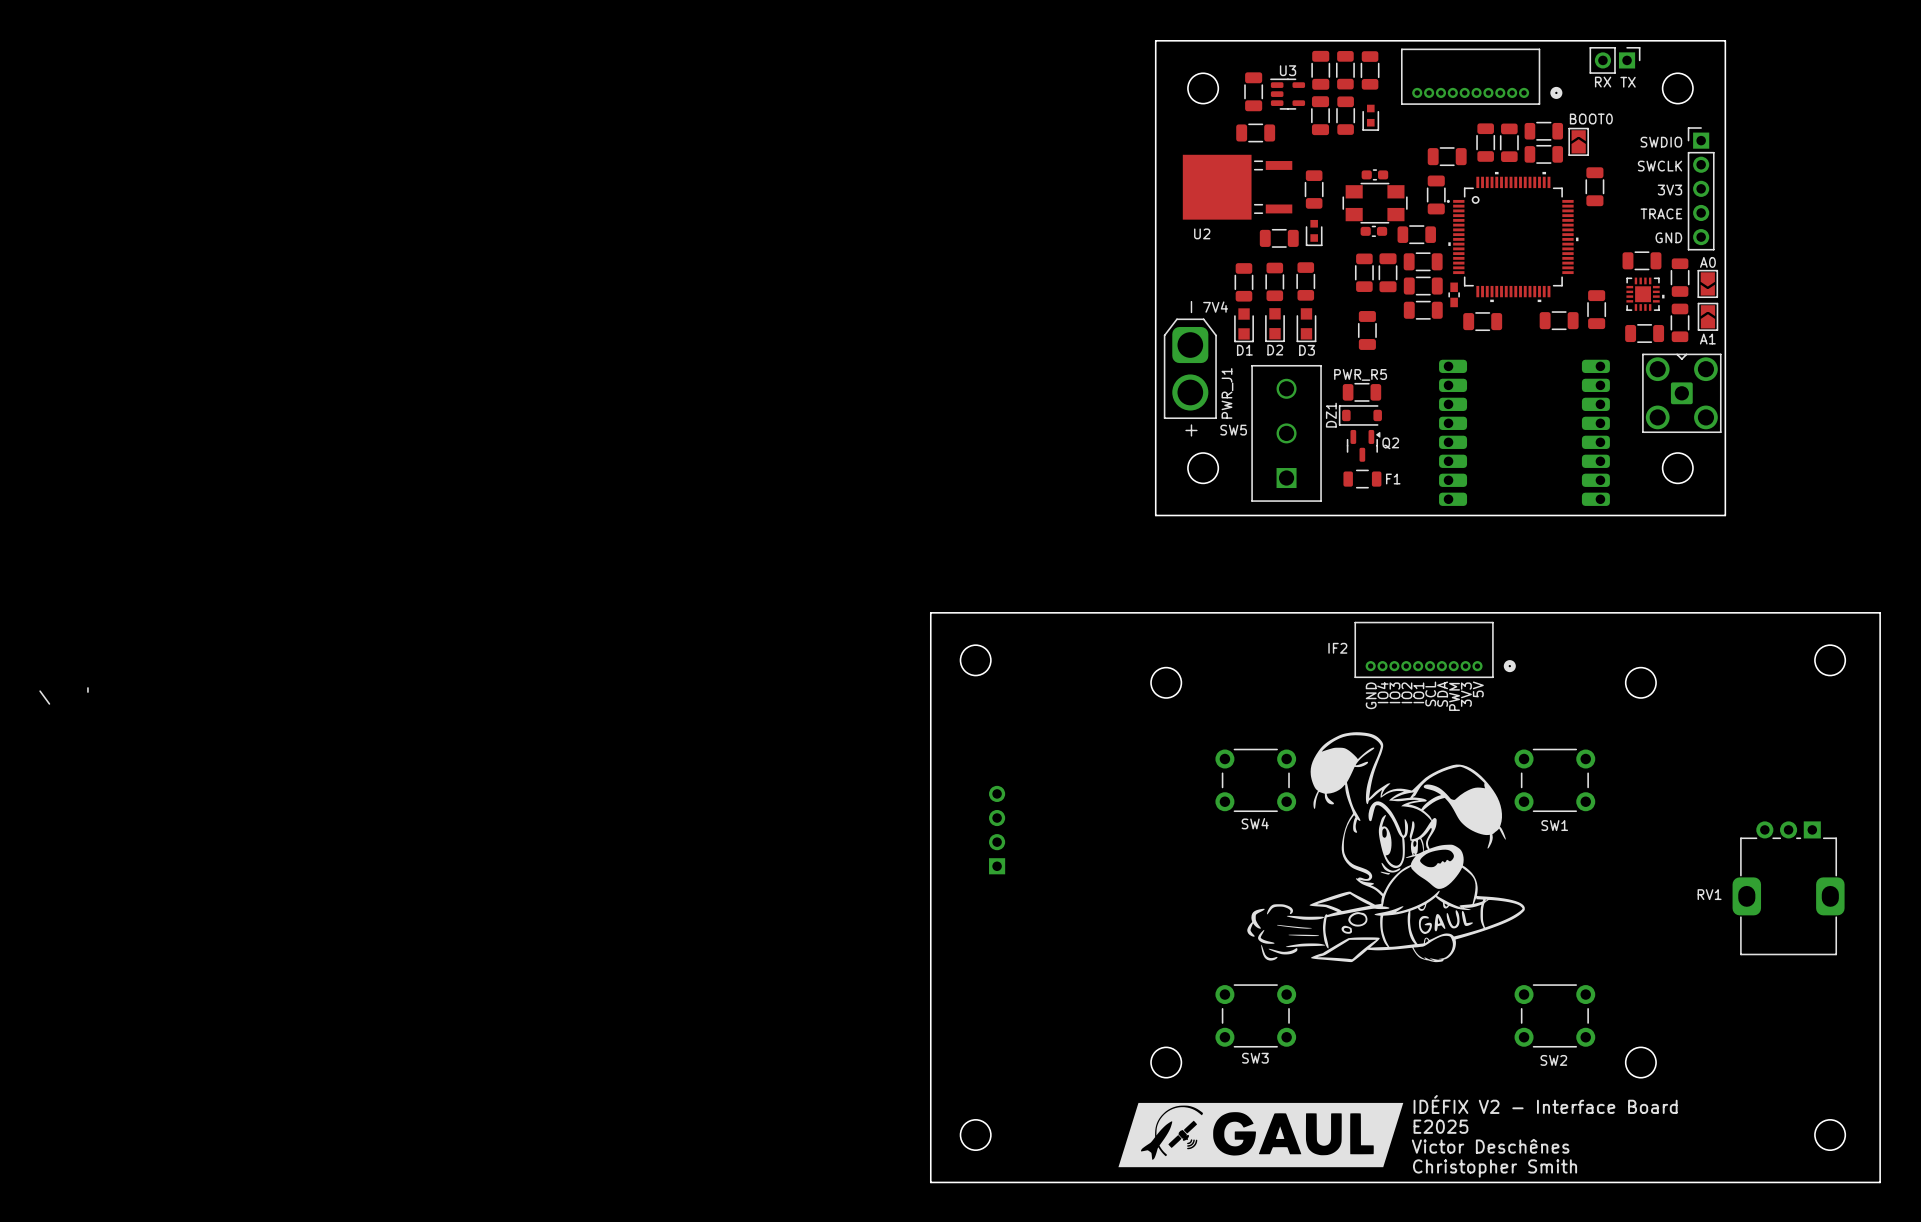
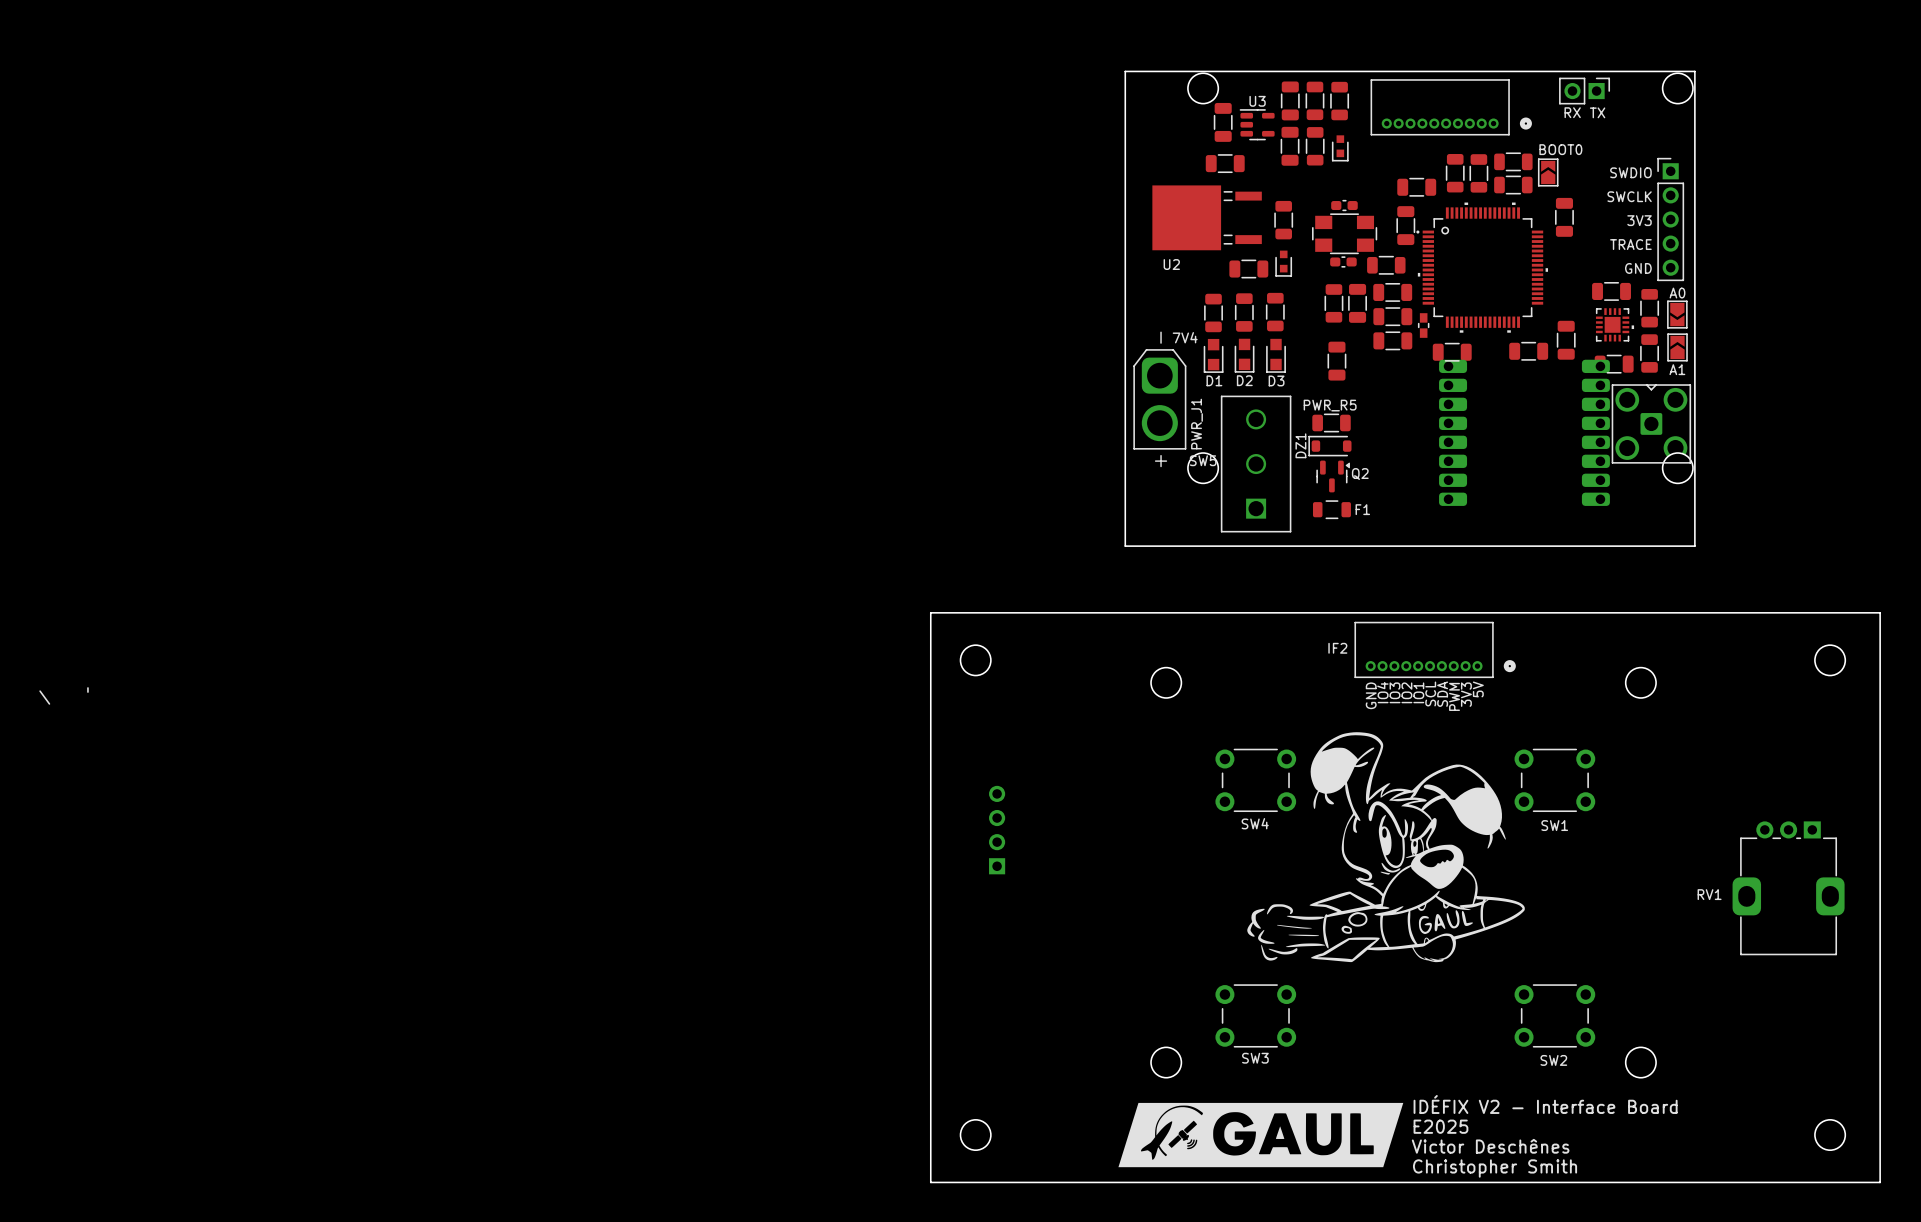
board edge: (1155, 40) (1725, 40) (1725, 515) (1155, 515) (1155, 40) -> (1125, 71) (1694, 71) (1694, 546) (1125, 546) (1125, 71)
part position: (1614, 60) -> (1584, 91)
part: (1320, 70) -> none
part: (1345, 70) -> none
part: (1370, 70) -> none
part position: (1481, 76) -> (1451, 107)
text position: RX (1603, 82) -> RX (1572, 112)
text position: TX (1628, 82) -> TX (1597, 112)
part: (1253, 91) -> none
U3 position: (1287, 94) -> (1257, 124)
part: none -> (1290, 100)
part: none -> (1314, 100)
part: none -> (1339, 101)
part: (1320, 115) -> none
part: (1345, 115) -> none
part position: (1370, 117) -> (1340, 148)
text position: BOOT0 (1591, 119) -> BOOT0 (1560, 149)
part: none -> (1223, 122)
part: (1543, 131) -> none
part: (1255, 132) -> none
part position: (1578, 141) -> (1548, 172)
part: (1485, 142) -> none
part: (1509, 142) -> none
text position: SWDIO (1661, 142) -> SWDIO (1630, 172)
part: none -> (1290, 146)
part: none -> (1315, 146)
part: (1543, 154) -> none
part: (1447, 156) -> none
part: none -> (1513, 161)
part: none -> (1225, 163)
text position: SWCLK (1660, 166) -> SWCLK (1629, 196)
part: none -> (1455, 173)
part: none -> (1478, 173)
part: (1374, 174) -> none
part: none -> (1513, 185)
part position: (1594, 186) -> (1564, 217)
U2 position: (1237, 187) -> (1207, 217)
part position: (1701, 188) -> (1670, 219)
part: (1314, 189) -> none
text position: 3V3 (1669, 190) -> 3V3 (1639, 220)
part rotation: 0° (1436, 194) -> 90° clockwise (1416, 187)
part position: (1375, 203) -> (1344, 233)
part: none -> (1344, 205)
text position: TRACE (1661, 213) -> TRACE (1630, 244)
part: none -> (1283, 220)
part: none -> (1405, 225)
part: (1373, 231) -> none
part position: (1314, 232) -> (1283, 263)
part: (1416, 234) -> none
part position: (1512, 236) -> (1482, 267)
text position: GND (1668, 237) -> GND (1638, 268)
part position: (1279, 238) -> (1248, 269)
part footprint: [1378, 253, 1398, 293] -> [1367, 256, 1406, 275]
part: (1641, 260) -> none
part: none -> (1343, 261)
part: (1423, 261) -> none
text position: A0 (1707, 262) -> A0 (1677, 293)
part: (1364, 272) -> none
part: (1680, 277) -> none
part: (1274, 281) -> none
part: (1305, 281) -> none
part: (1243, 282) -> none
part: (1707, 283) -> none
part: (1423, 286) -> none
part: none -> (1611, 291)
part: none -> (1392, 292)
part position: (1454, 294) -> (1423, 325)
part position: (1645, 294) -> (1615, 324)
part: none -> (1333, 303)
part: none -> (1357, 303)
part footprint: [1670, 303, 1690, 343] -> [1667, 300, 1688, 329]
text position: 7V4 (1215, 307) -> 7V4 (1185, 337)
part: none -> (1649, 308)
part: (1596, 309) -> none
part: (1423, 310) -> none
part: none -> (1213, 312)
part: none -> (1244, 312)
part: none -> (1275, 312)
part: none -> (1392, 316)
part: (1707, 316) -> none
part rotation: 0° (1559, 320) -> 90° clockwise (1566, 340)
part: (1482, 321) -> none
D2 position: (1275, 324) -> (1244, 355)
D1 position: (1244, 325) -> (1213, 355)
D3 position: (1306, 325) -> (1276, 355)
part: (1367, 330) -> none
part: (1644, 333) -> none
text position: A1 (1707, 339) -> A1 (1677, 369)
part: none -> (1392, 340)
part: none -> (1677, 347)
part: none -> (1528, 351)
part: none -> (1452, 352)
part: none -> (1649, 353)
part: none -> (1336, 361)
part: none -> (1614, 364)
PWR_J1 position: (1190, 368) -> (1159, 399)
PWR_R5 position: (1361, 392) -> (1331, 422)
part position: (1681, 393) -> (1651, 423)
DZ1 position: (1360, 415) -> (1330, 446)
SW5 position: (1286, 433) -> (1256, 464)
Q2 position: (1363, 445) -> (1333, 476)
F1 position: (1362, 479) -> (1331, 509)

